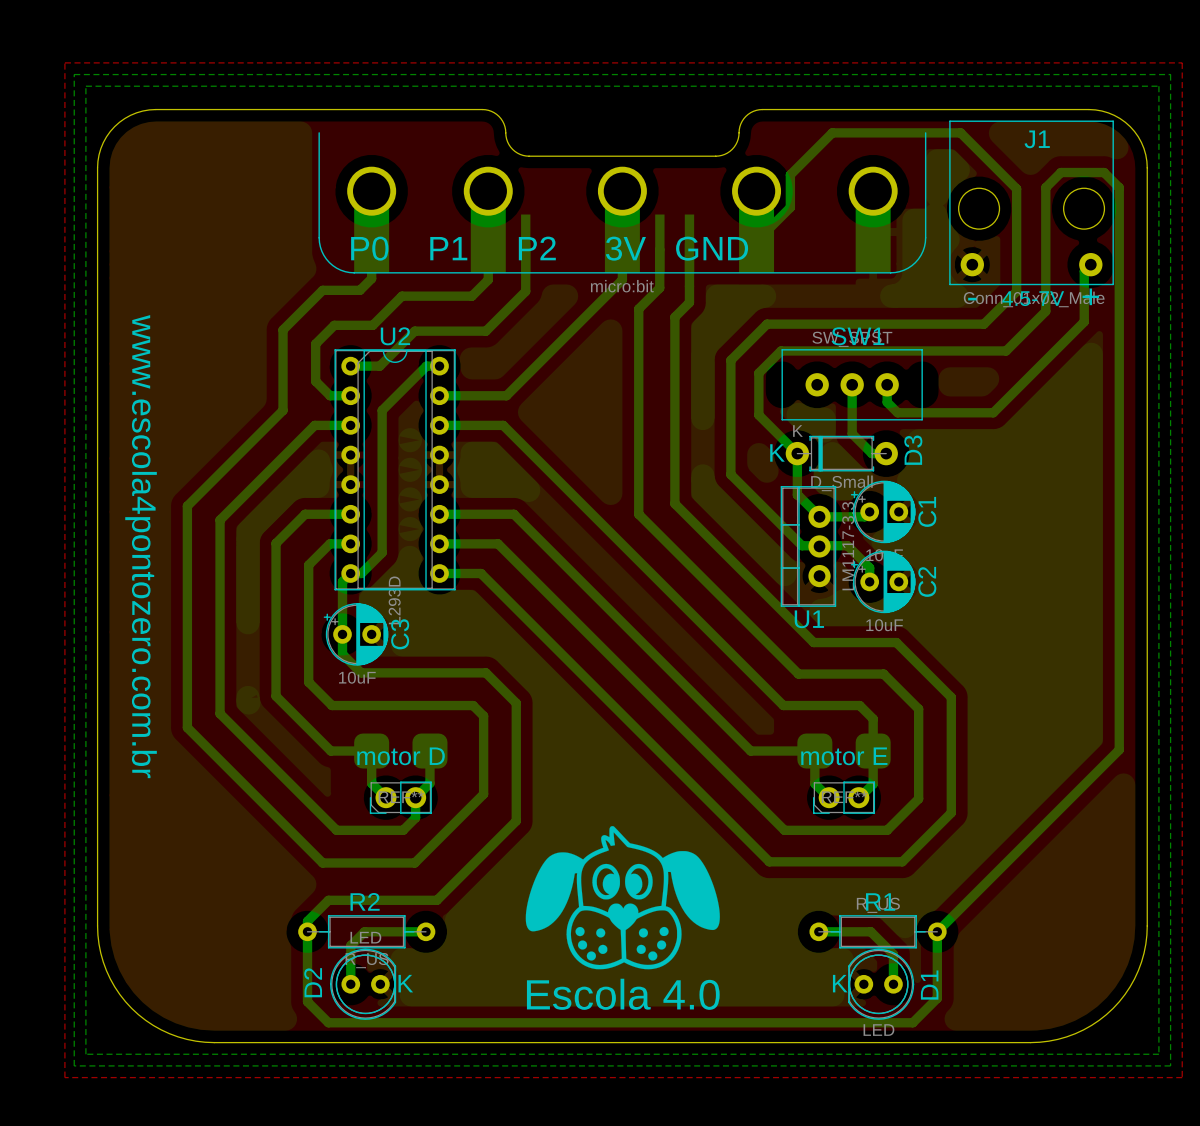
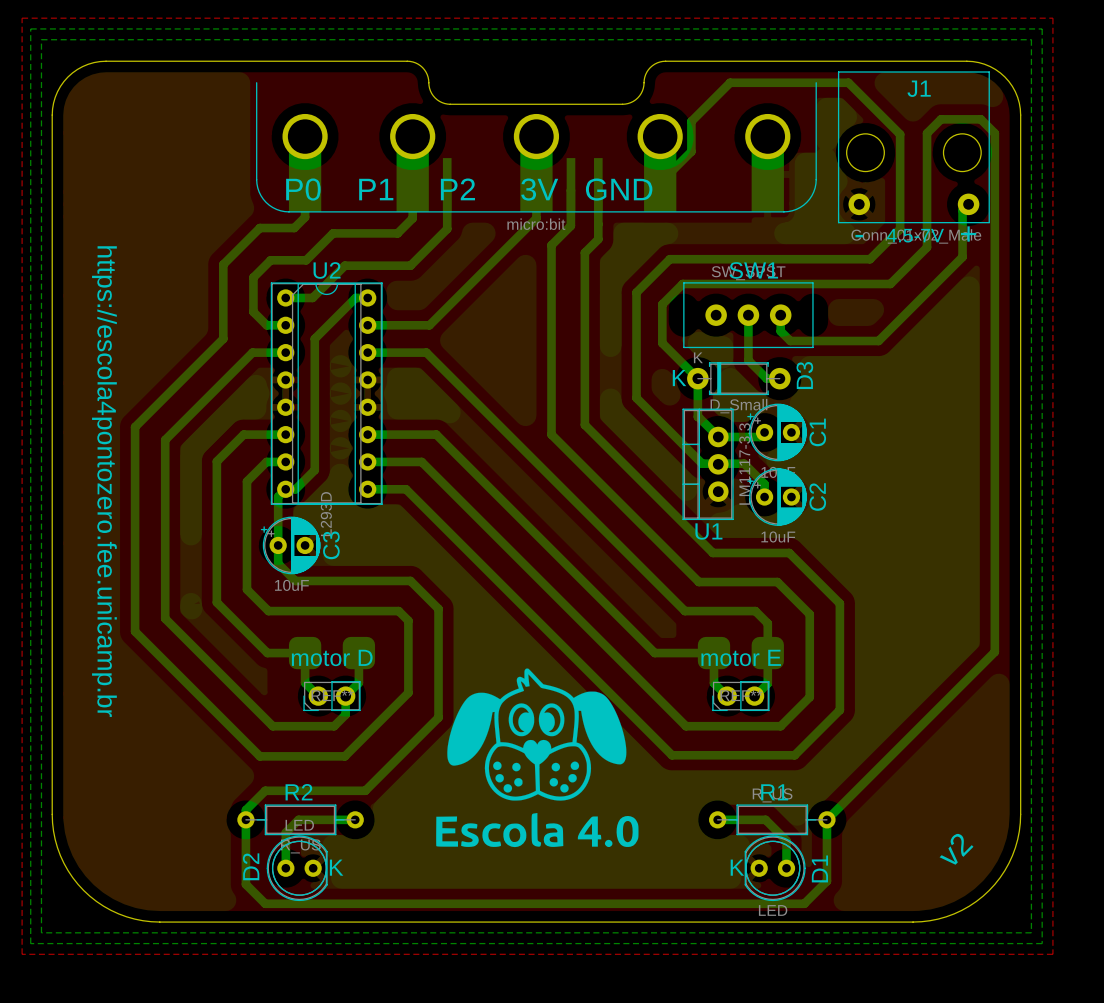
text: www.escola4pontozero.com.br (141, 546) -> https://escola4pontozero.fee.unicamp.br (104, 481)
drawing position: (622, 897) -> (536, 734)
drawing: none -> [436, 812, 639, 848]
text: none -> v2 (956, 849)
text: Escola 4.0 (623, 994) -> none

